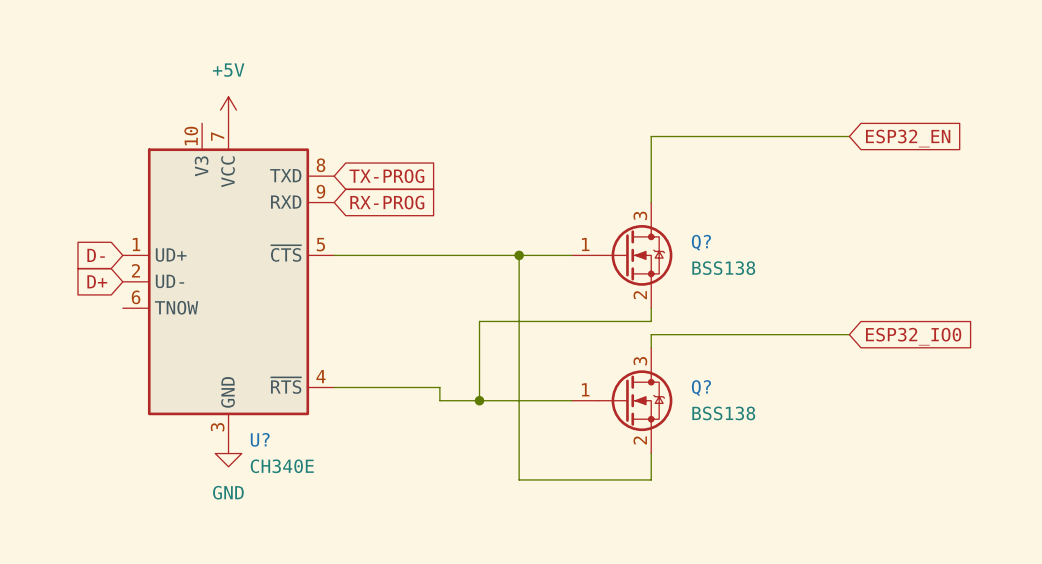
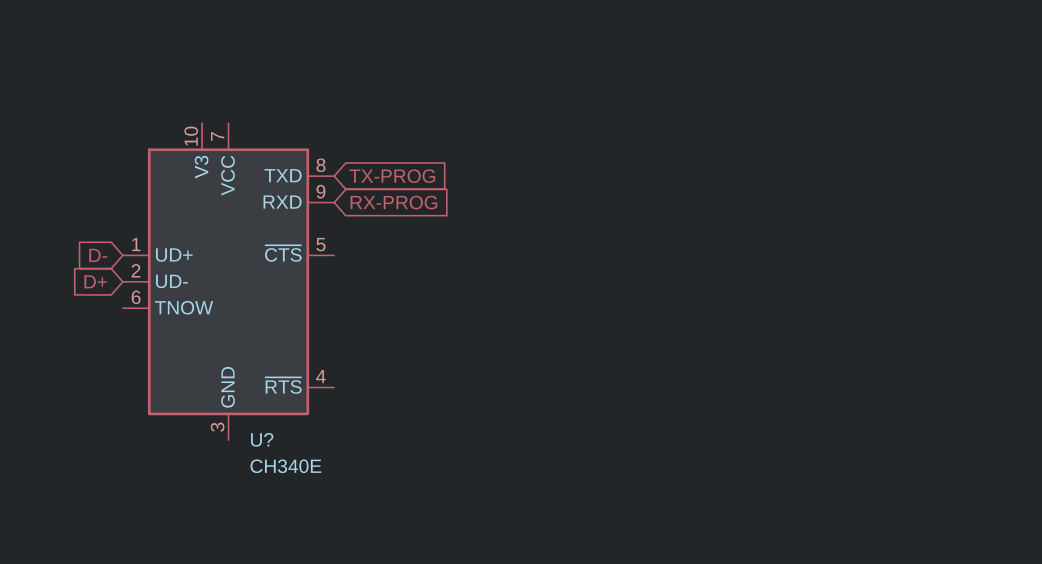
power symbol: +5V (228, 110) -> none
wire: (849, 136) (651, 136) (651, 202) -> none
global label: ESP32_EN (908, 138) -> none
wire: (334, 255) (571, 255) -> none
wire: (519, 255) (519, 479) (651, 479) (651, 453) -> none
junction: (519, 255) -> none
Q?: BSS138 (622, 255) -> none
wire: (651, 308) (651, 321) (479, 321) (479, 400) -> none
wire: (849, 334) (651, 334) (651, 347) -> none
global label: ESP32_IO0 (913, 336) -> none
wire: (334, 387) (439, 387) (439, 400) (571, 400) -> none
junction: (479, 400) -> none
Q?: BSS138 (622, 400) -> none
power symbol: GND (228, 453) -> none

